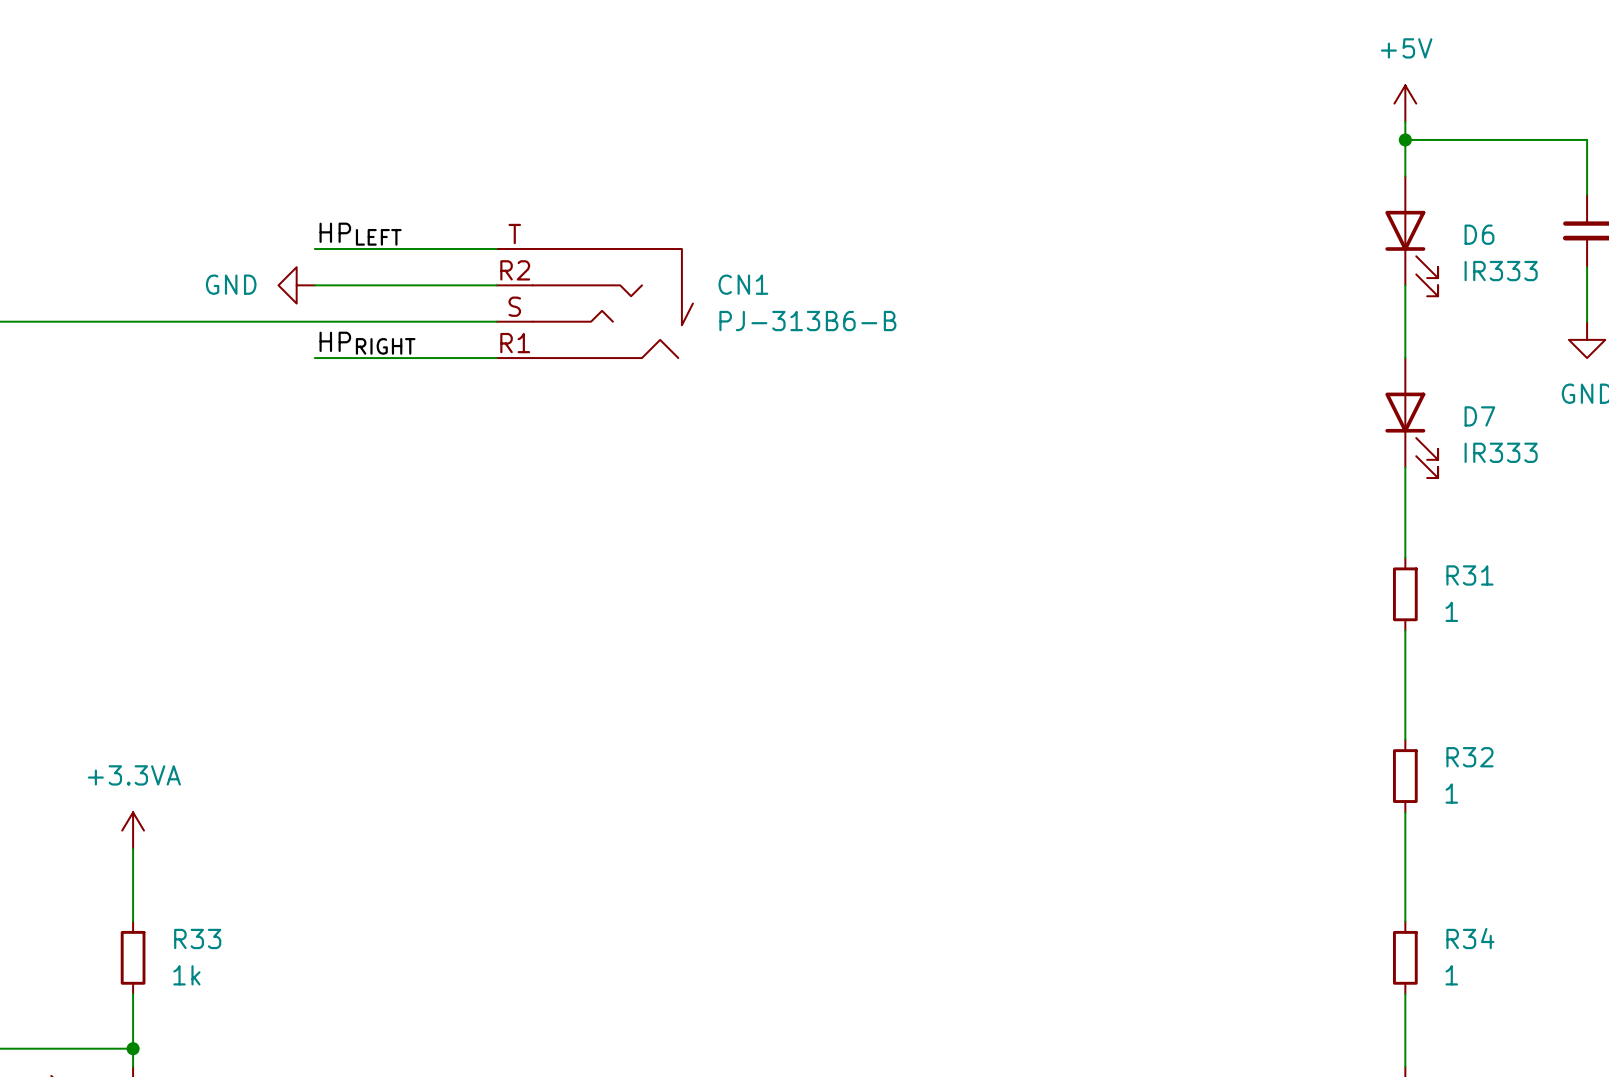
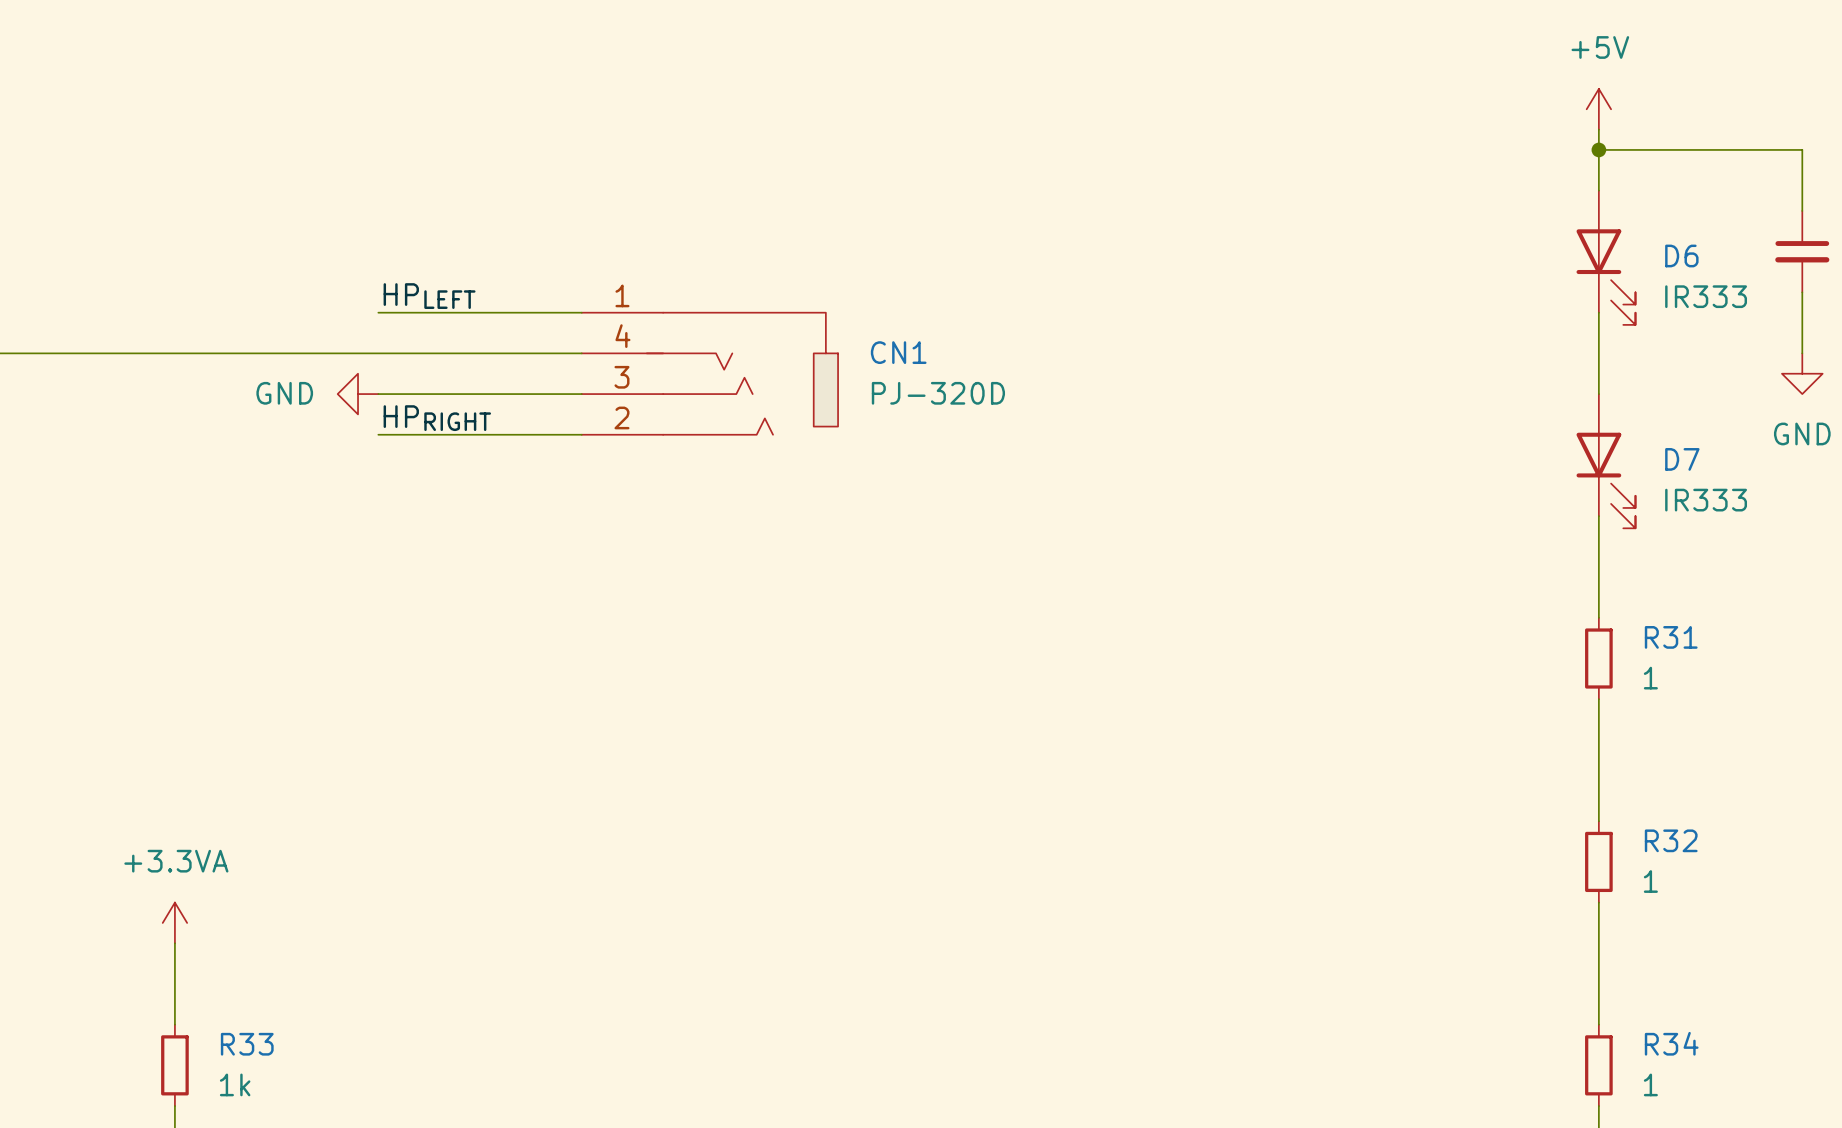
label position: HPLEFT (360, 234) -> HPLEFT (429, 296)
wire: (314, 249) (496, 249) -> (378, 434) (581, 434)
CN1 symbol: [496, 249, 693, 359] -> [581, 312, 839, 435]
power symbol position: GND (296, 285) -> GND (358, 394)
CN1 value: PJ-313B6-B (807, 321) -> PJ-320D (938, 393)
label position: HPRIGHT (367, 343) -> HPRIGHT (437, 418)

